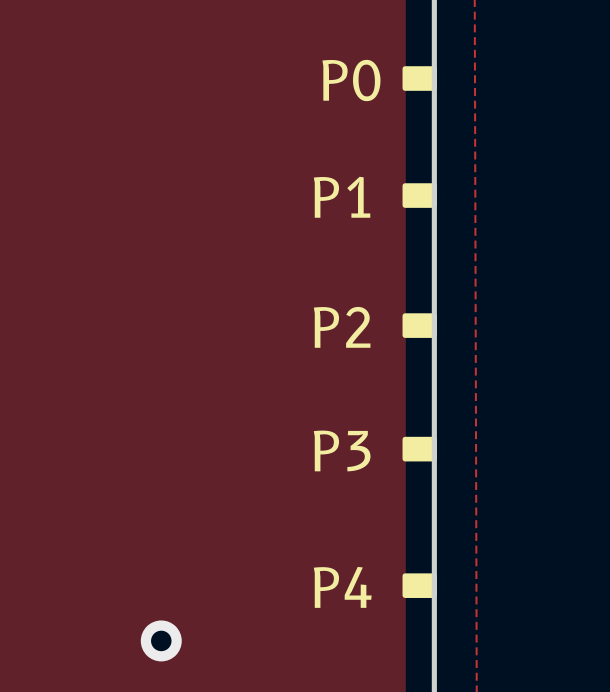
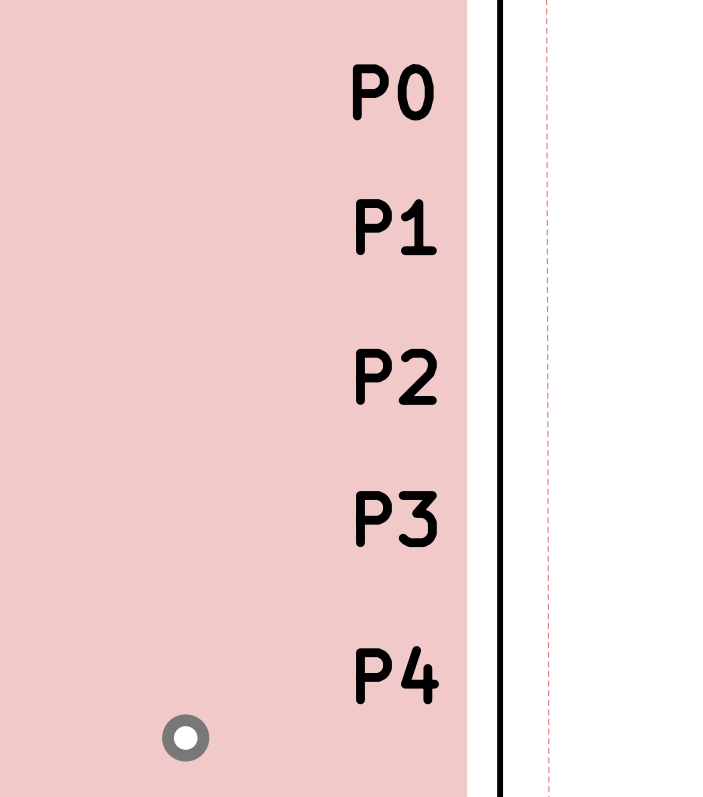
drawing: [402, 66, 437, 91] -> none
drawing: [402, 183, 437, 208] -> none
drawing: [402, 313, 437, 338] -> none
drawing: [402, 436, 437, 462] -> none
drawing: [402, 573, 437, 598] -> none

